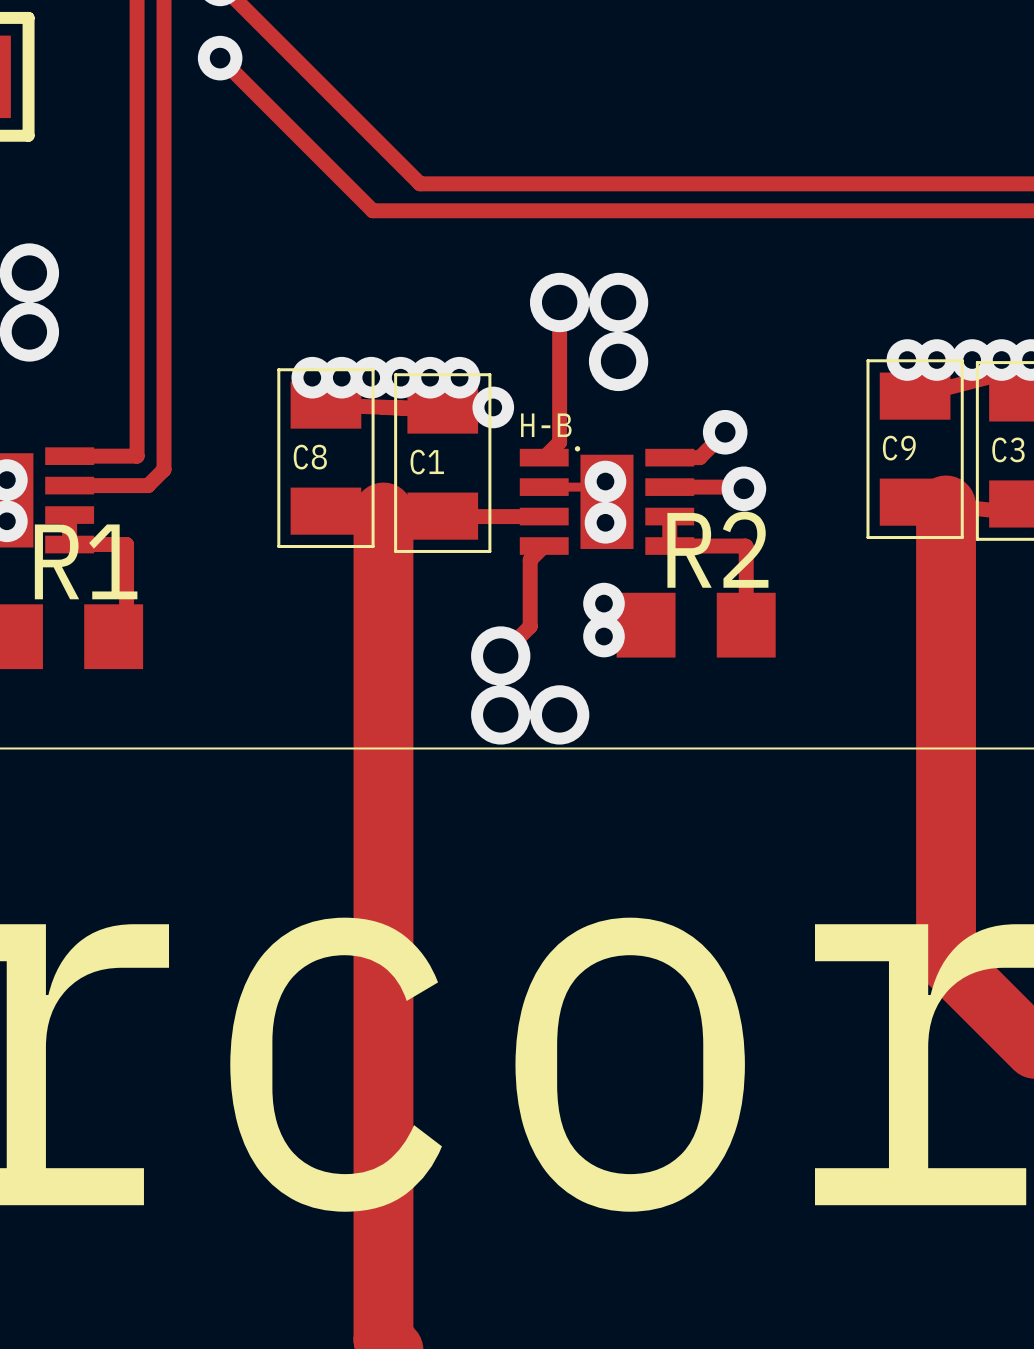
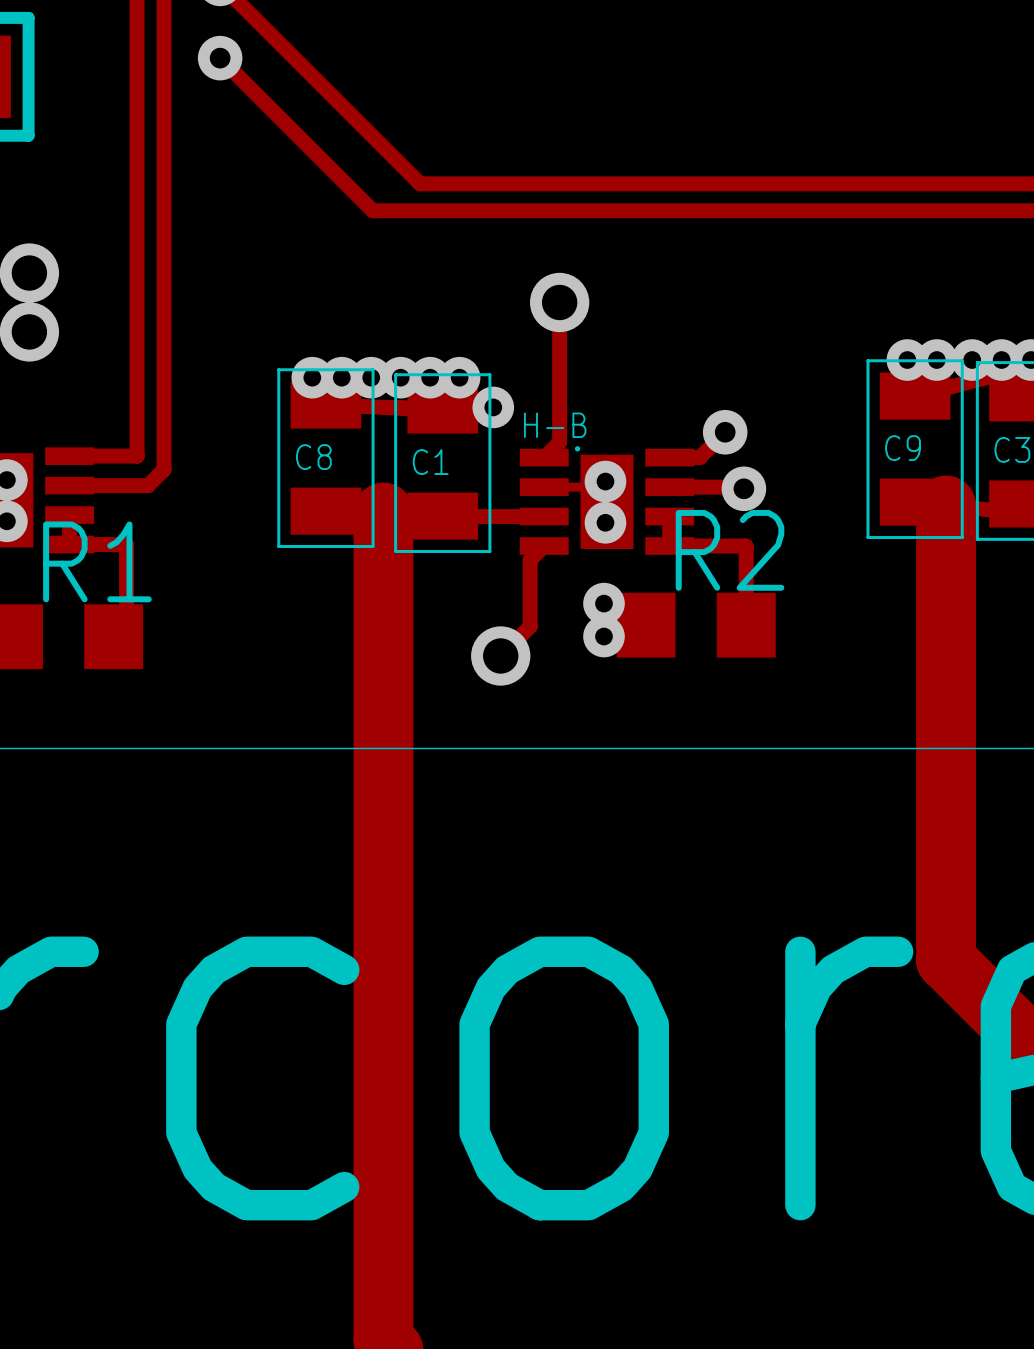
via: (618, 302) -> none
via: (618, 361) -> none
via: (500, 714) -> none
via: (559, 714) -> none

